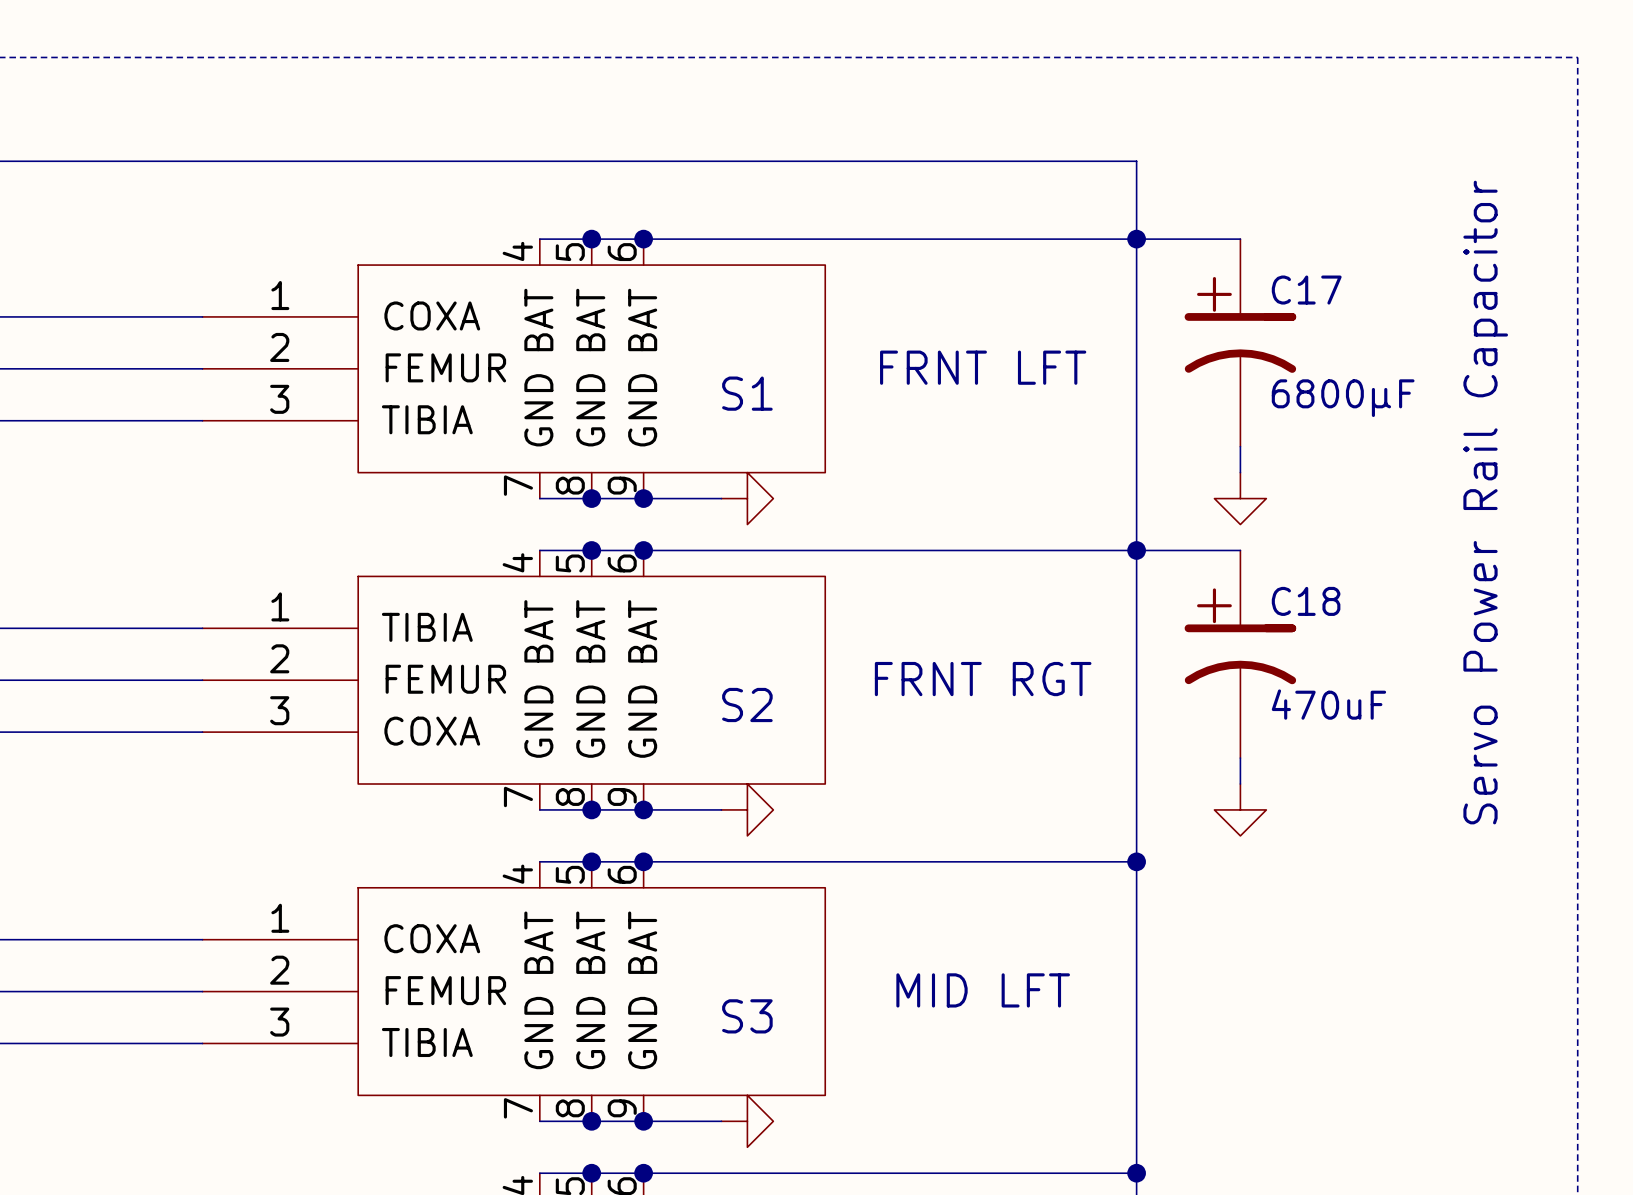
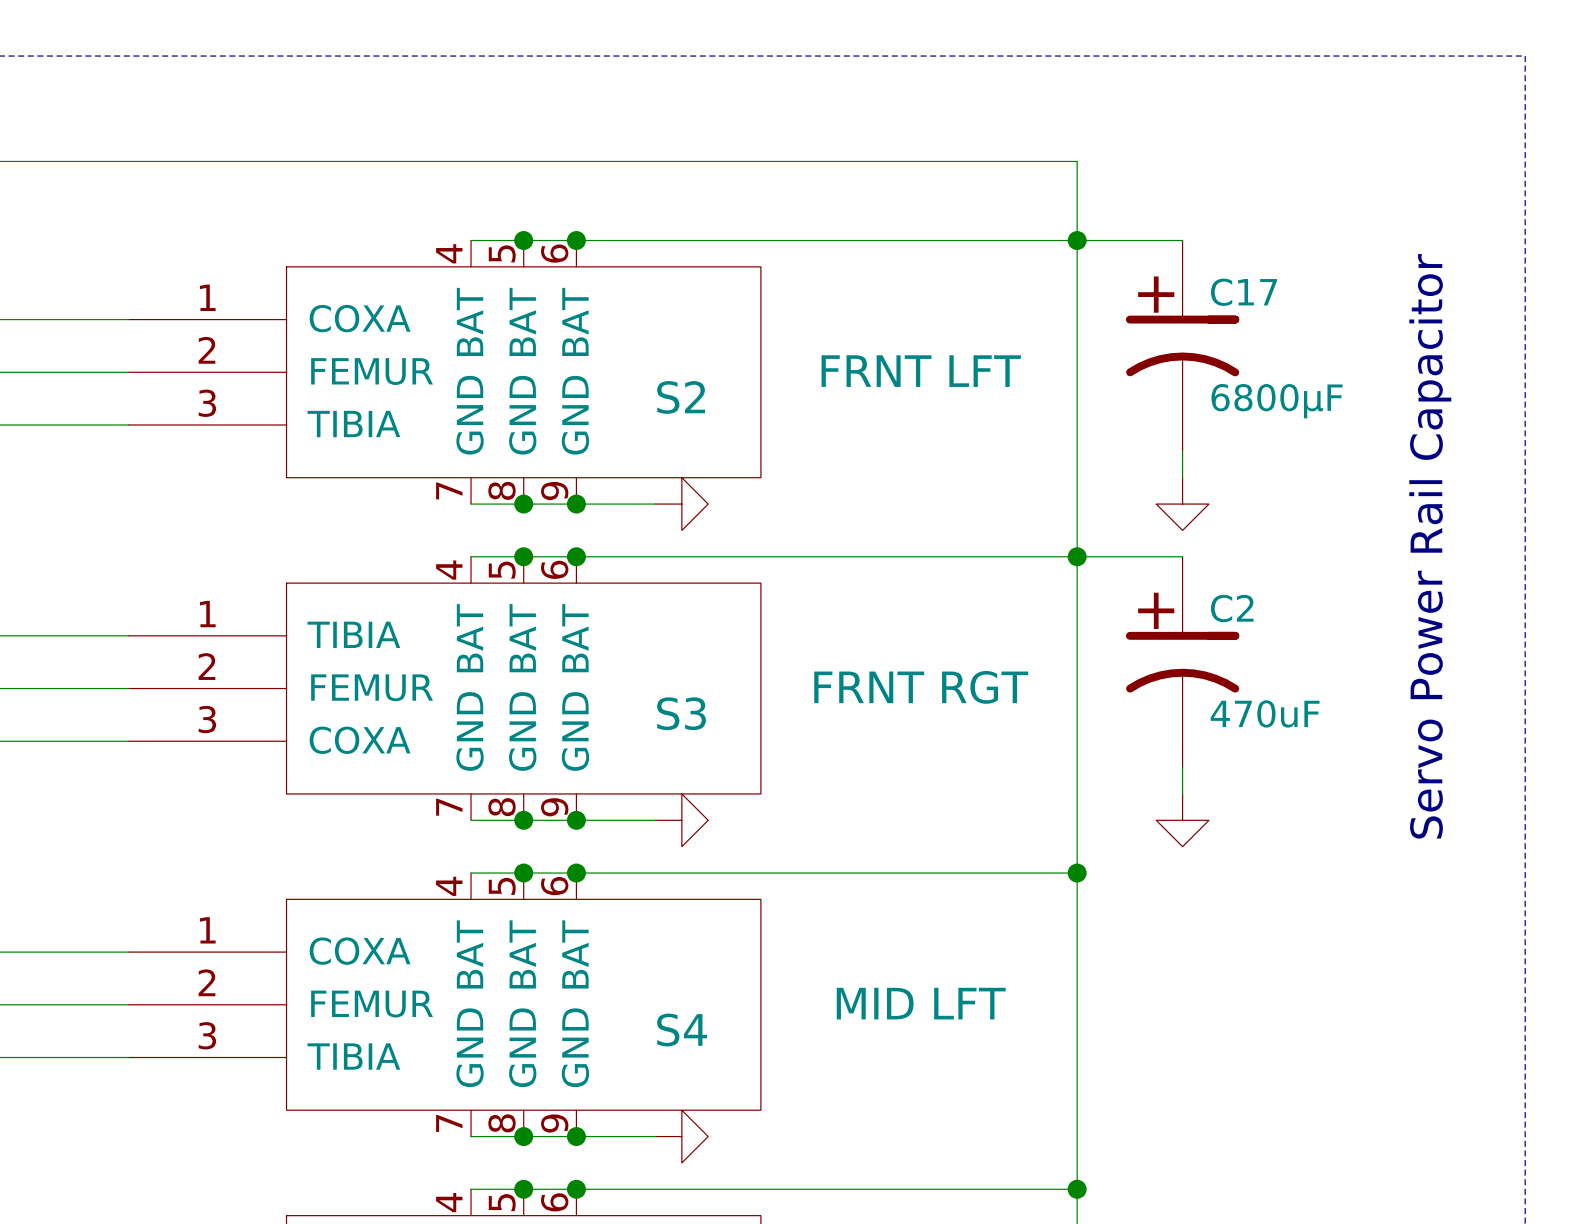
S1 name: S1 (747, 393) -> S2 (681, 397)
C18 name: C18 (1306, 601) -> C2 (1232, 608)
S2 name: S2 (747, 704) -> S3 (681, 713)
S3 name: S3 (747, 1016) -> S4 (682, 1029)

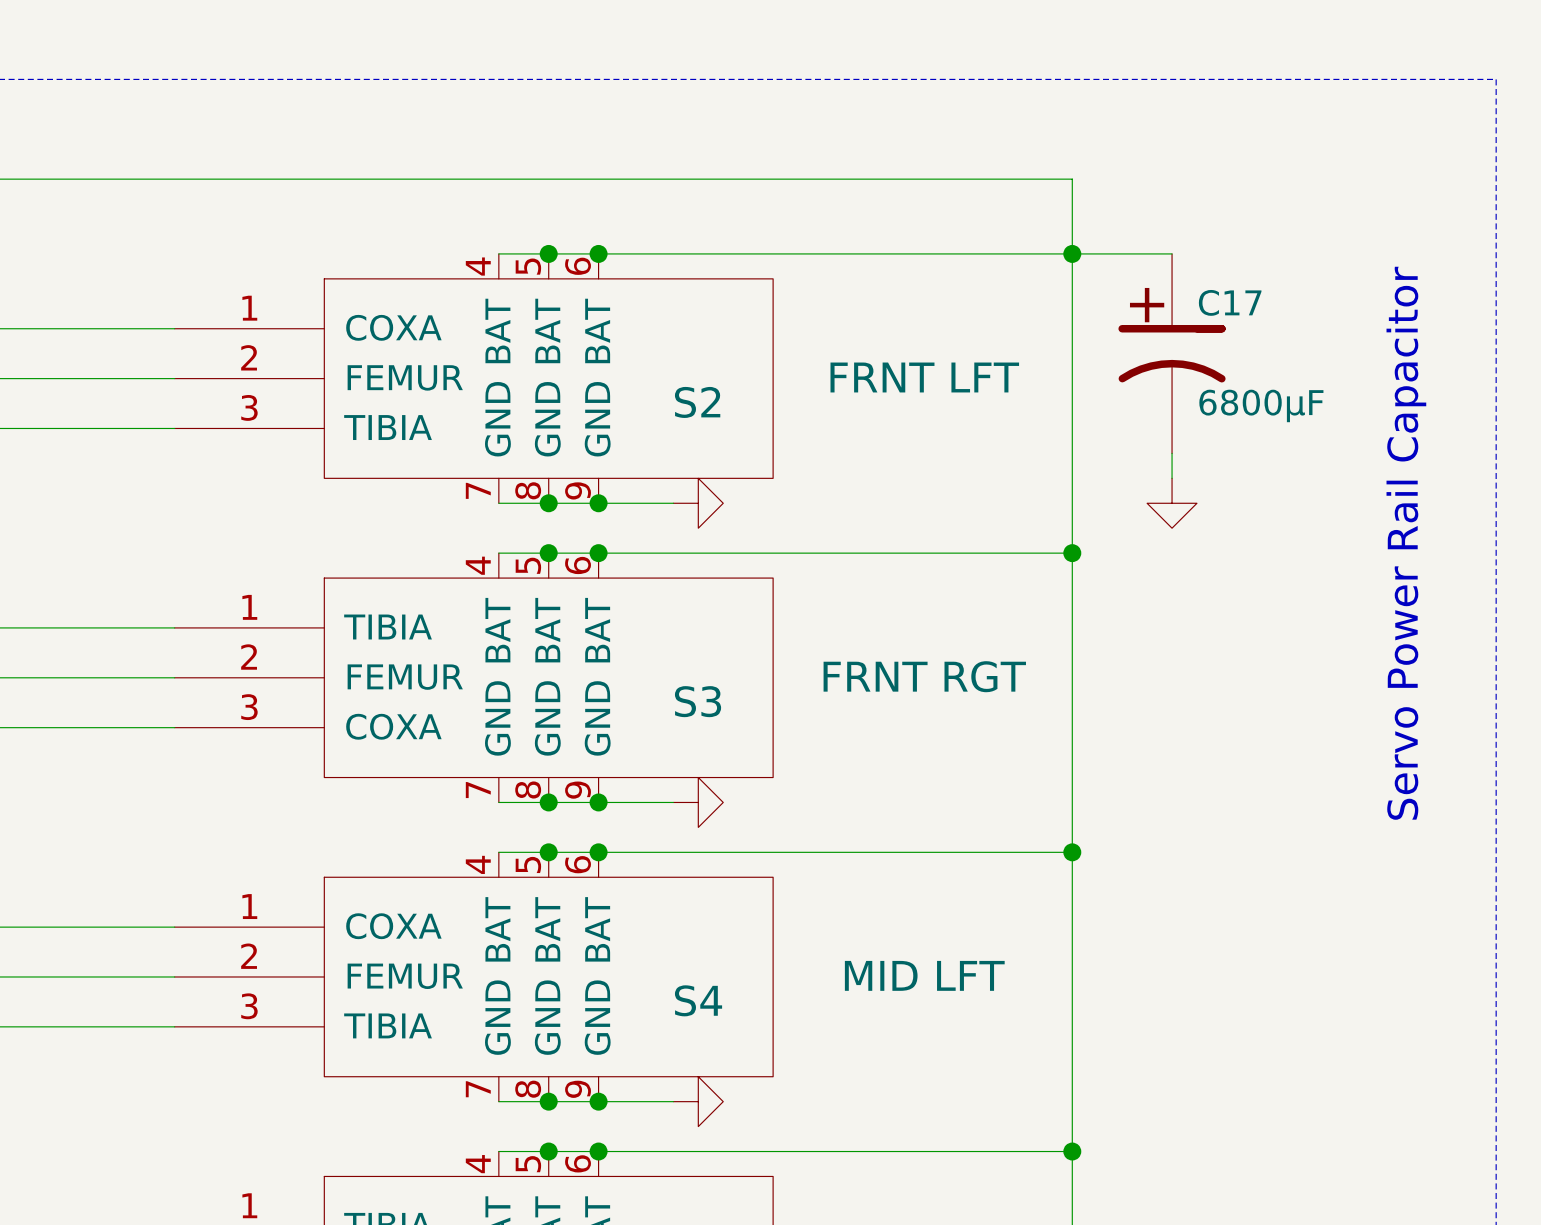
wire: (1077, 556) (1182, 556) -> none
C2: 470uF (1182, 662) -> none
wire: (1182, 767) (1182, 793) -> none
power symbol: (1182, 820) -> none

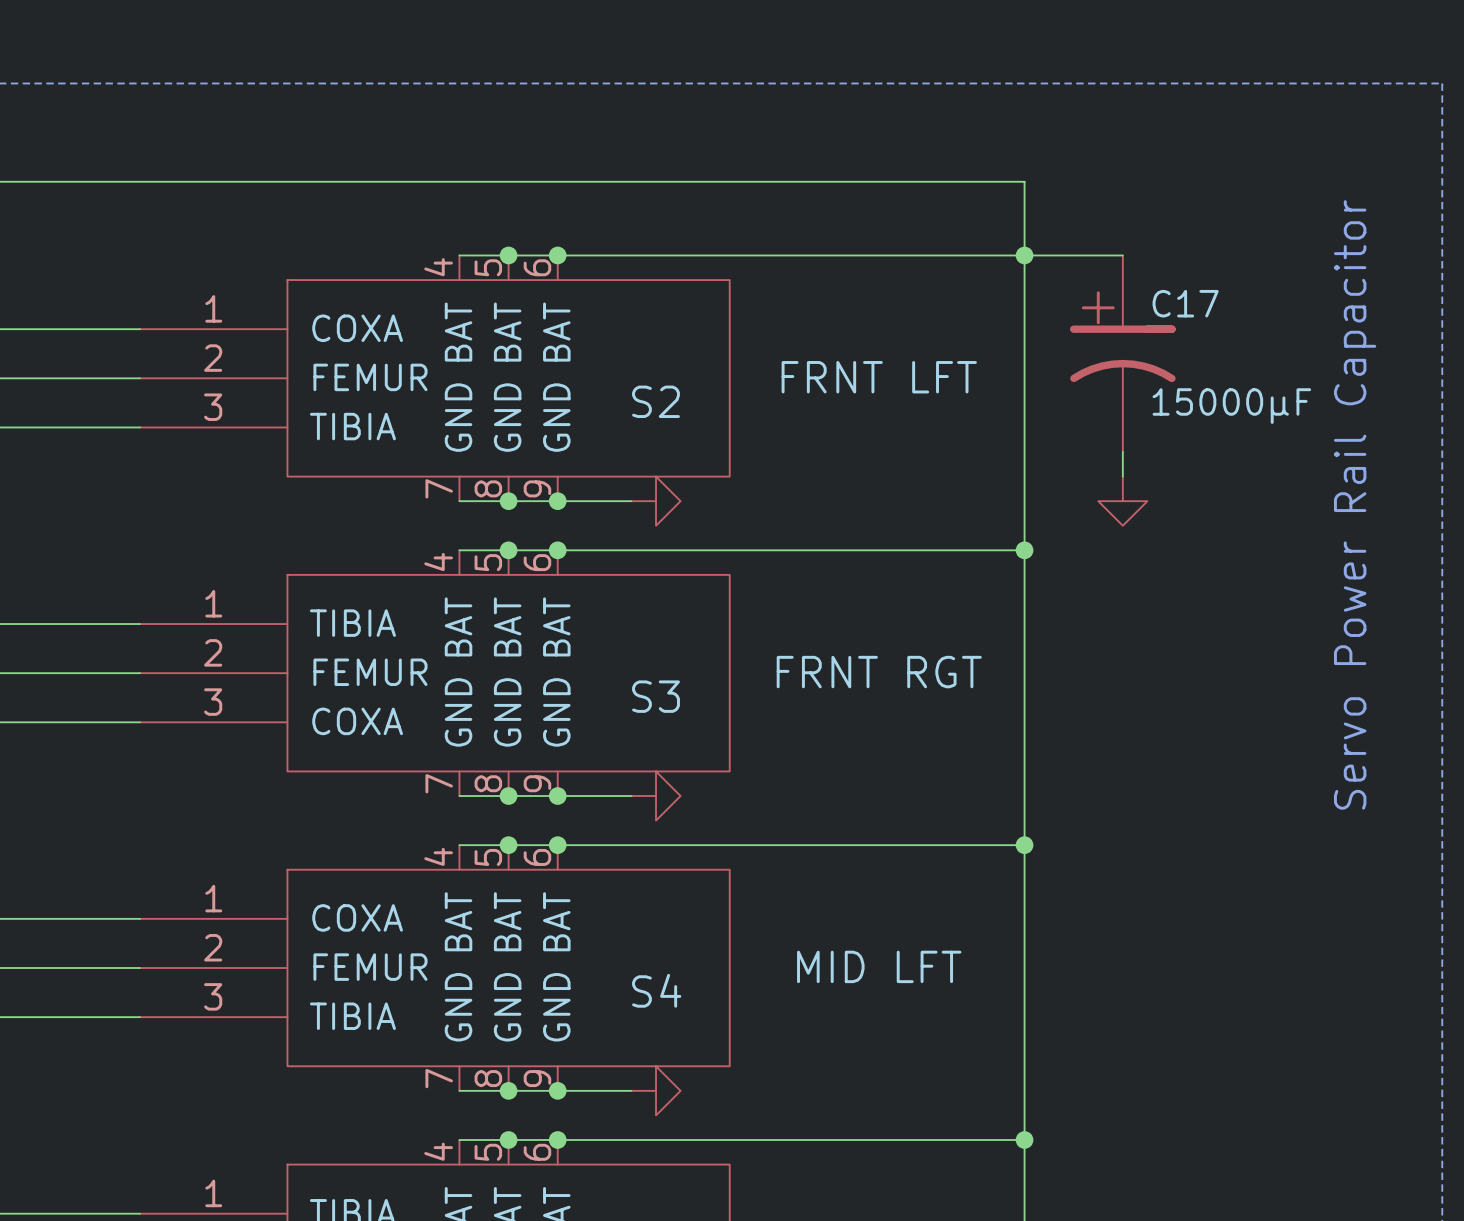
C17 value: 6800µF (1261, 405) -> 15000µF (1231, 406)

